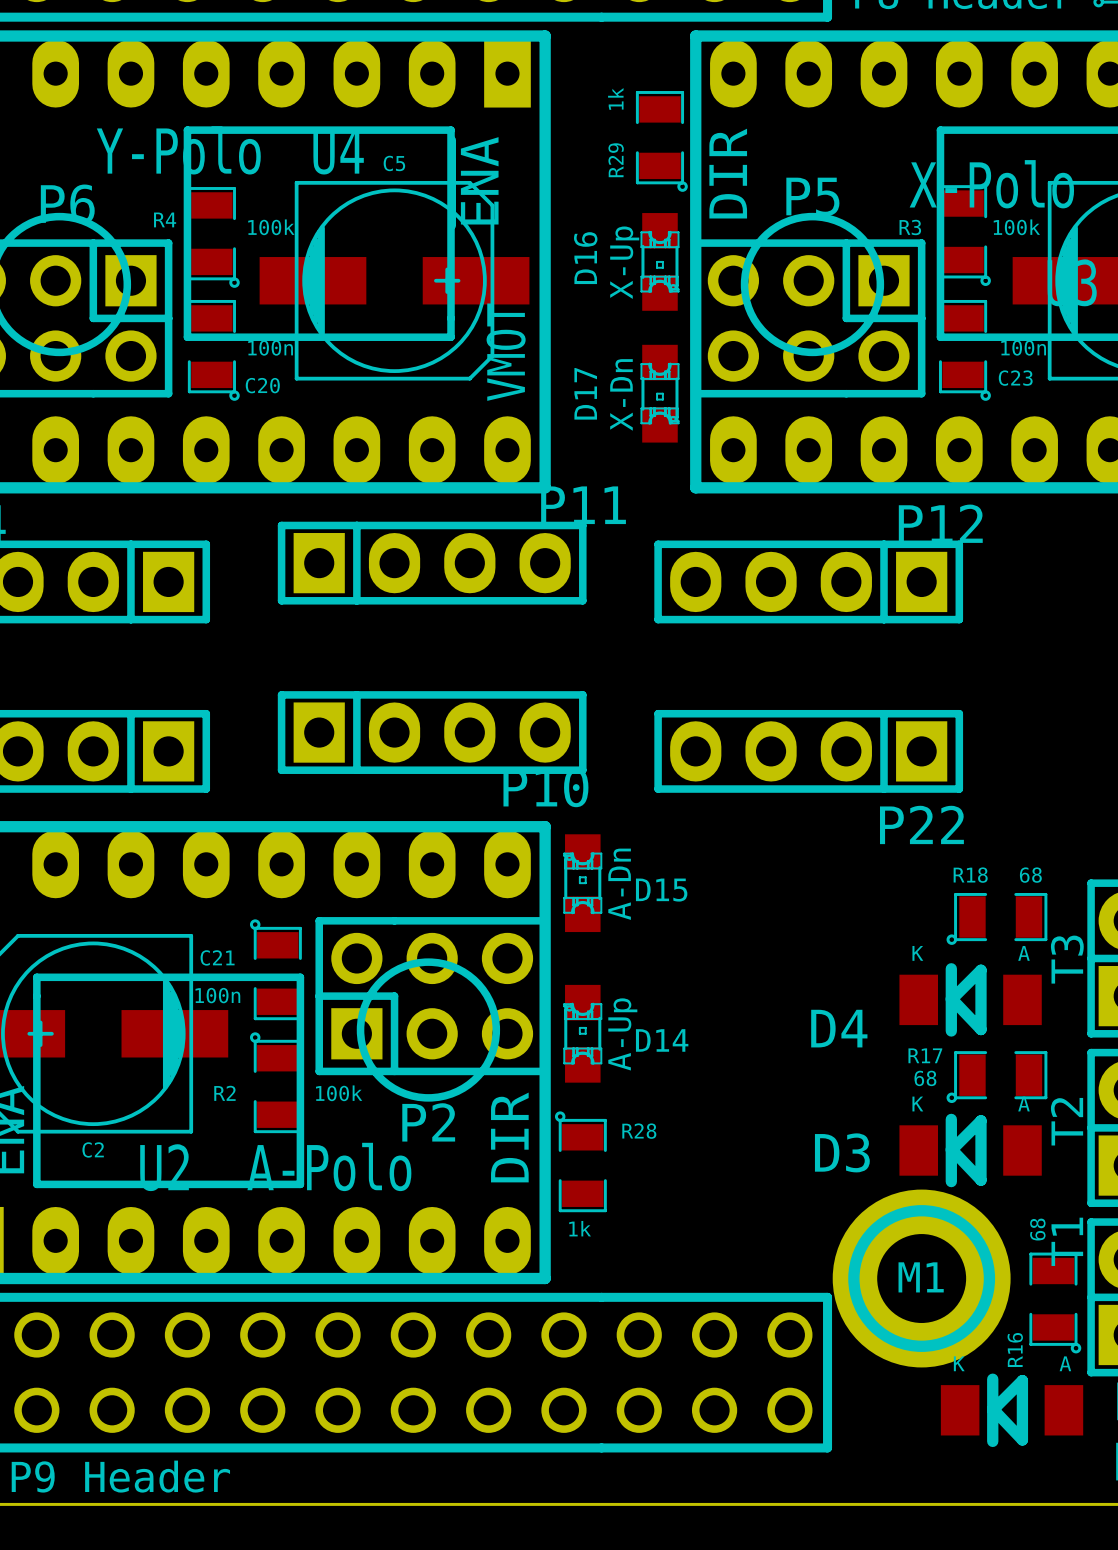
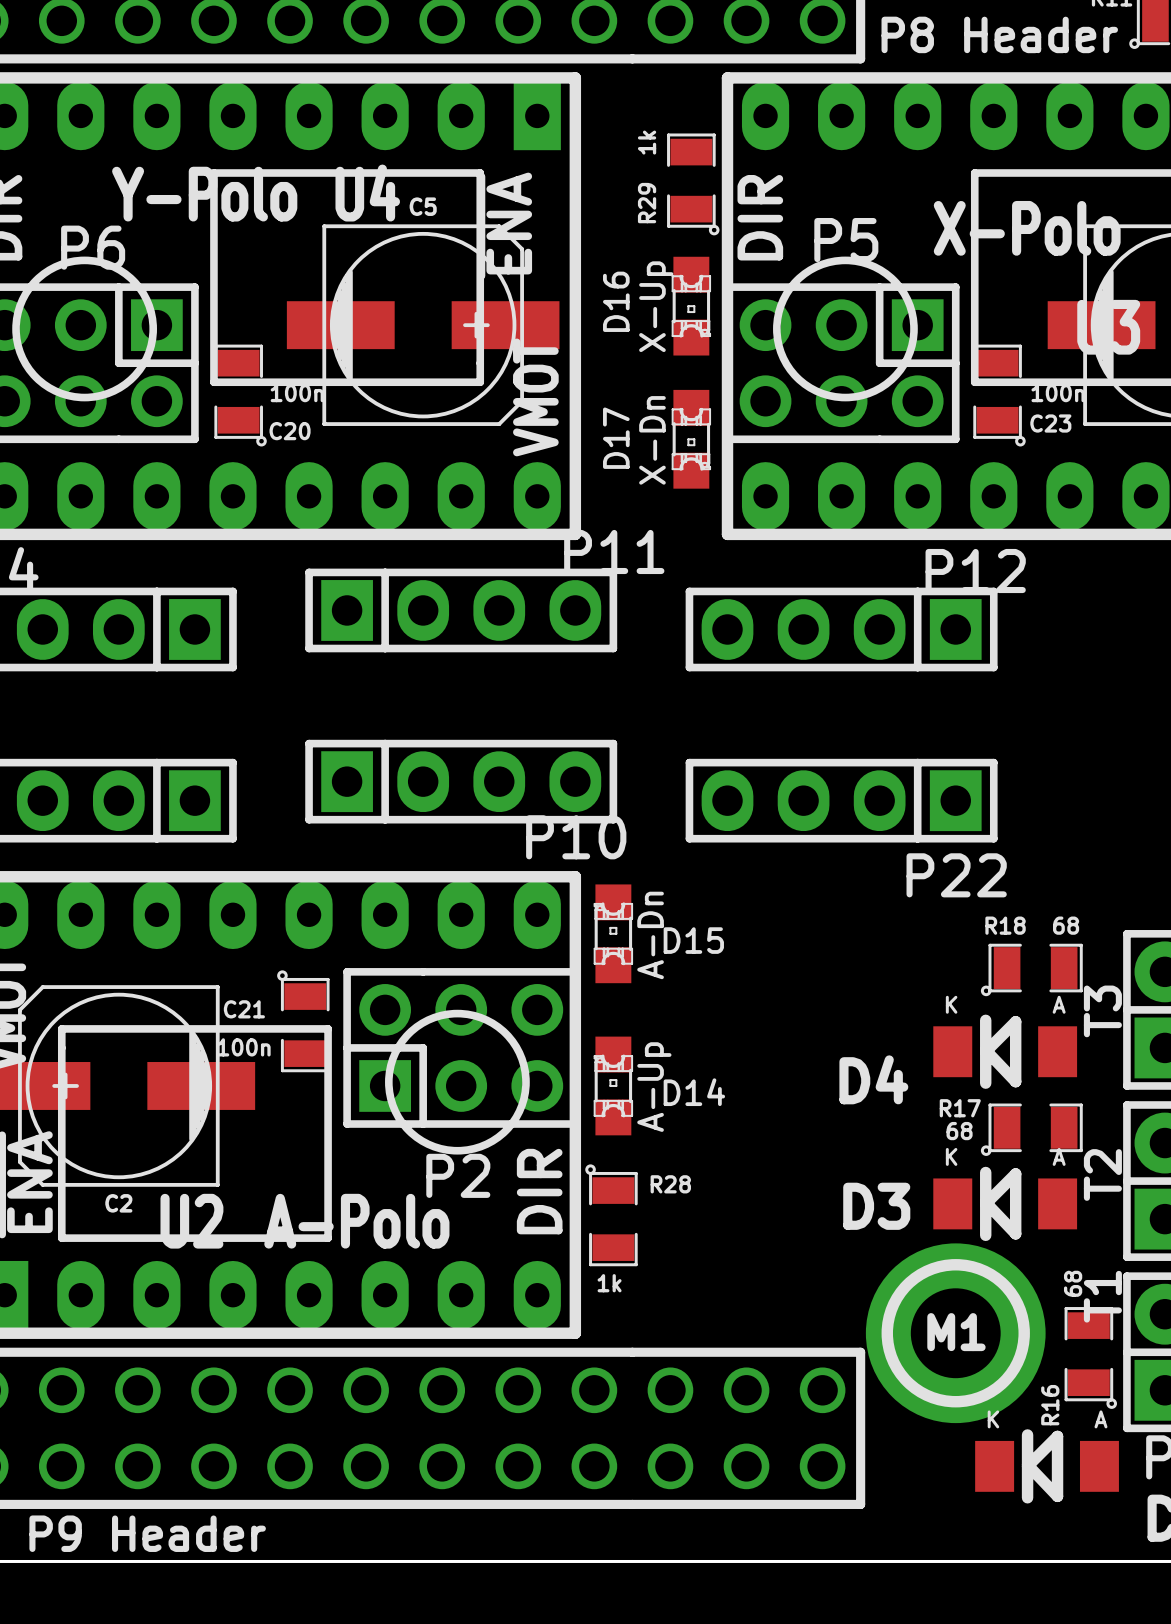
R3: 100k (964, 235) -> none
R4: 100k (213, 237) -> none
R2: 100k (275, 1082) -> none

